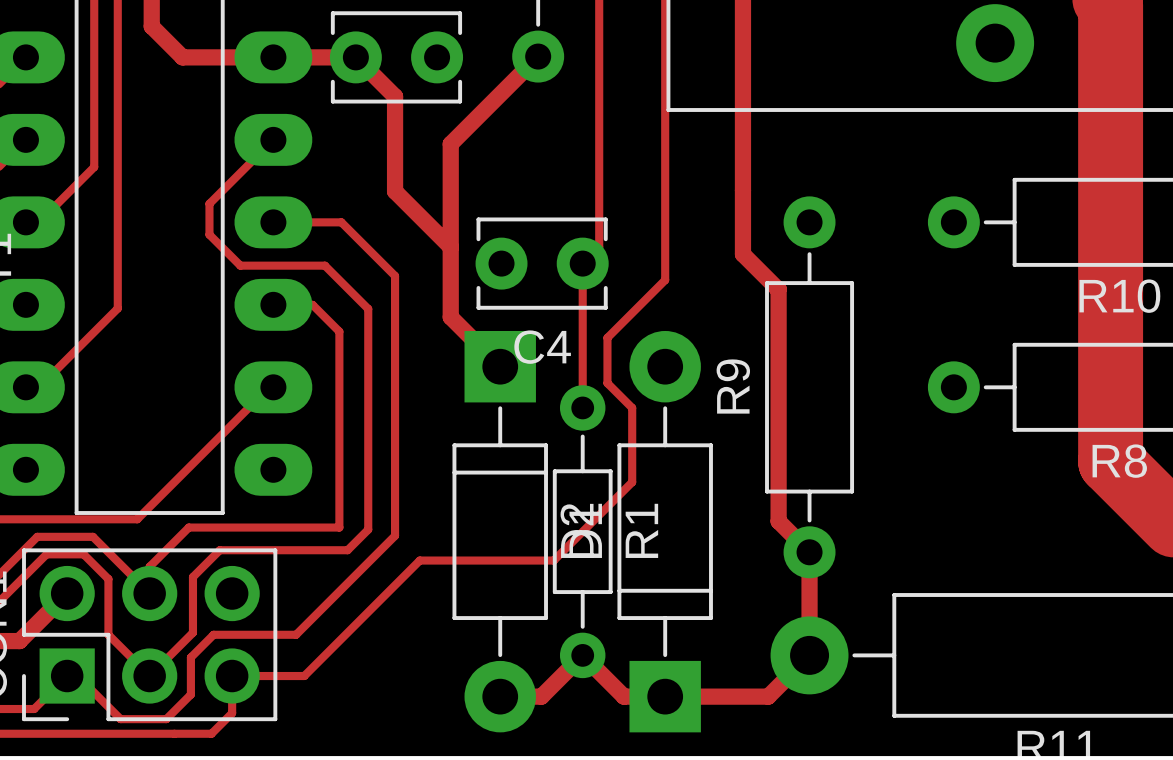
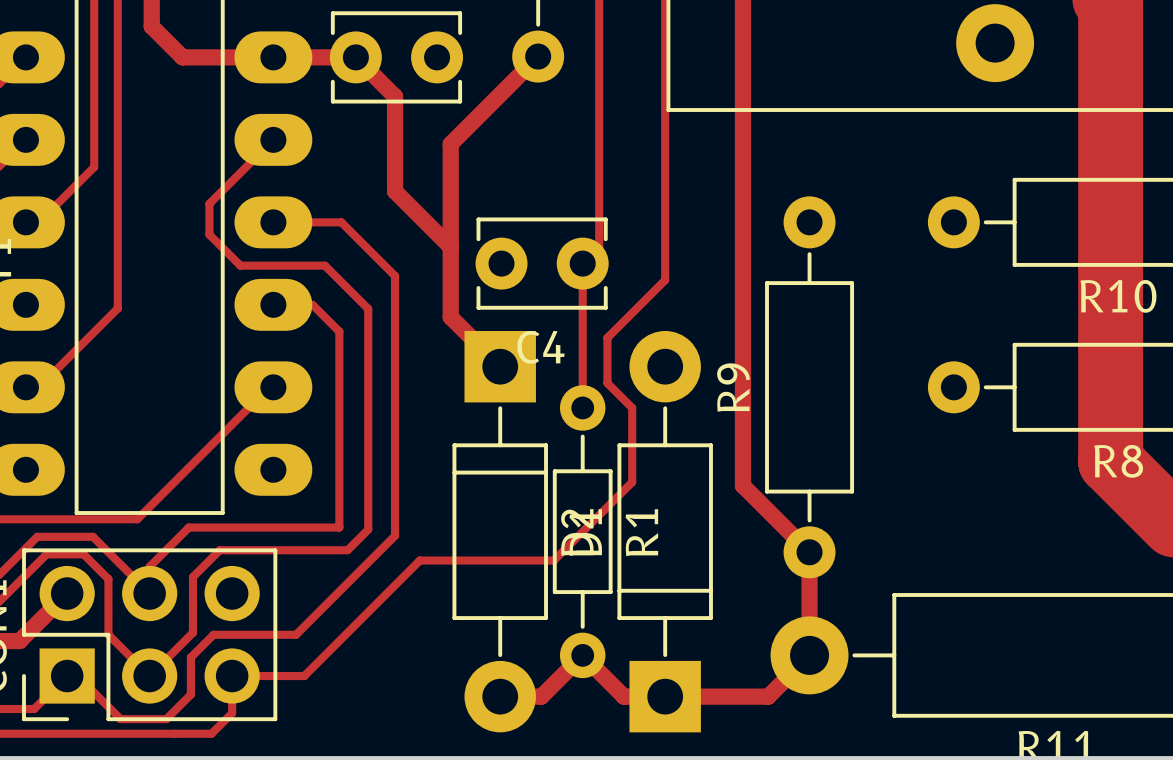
track: (742, 254) (778, 288) (778, 521) -> (742, 254) (742, 485) (778, 521)

